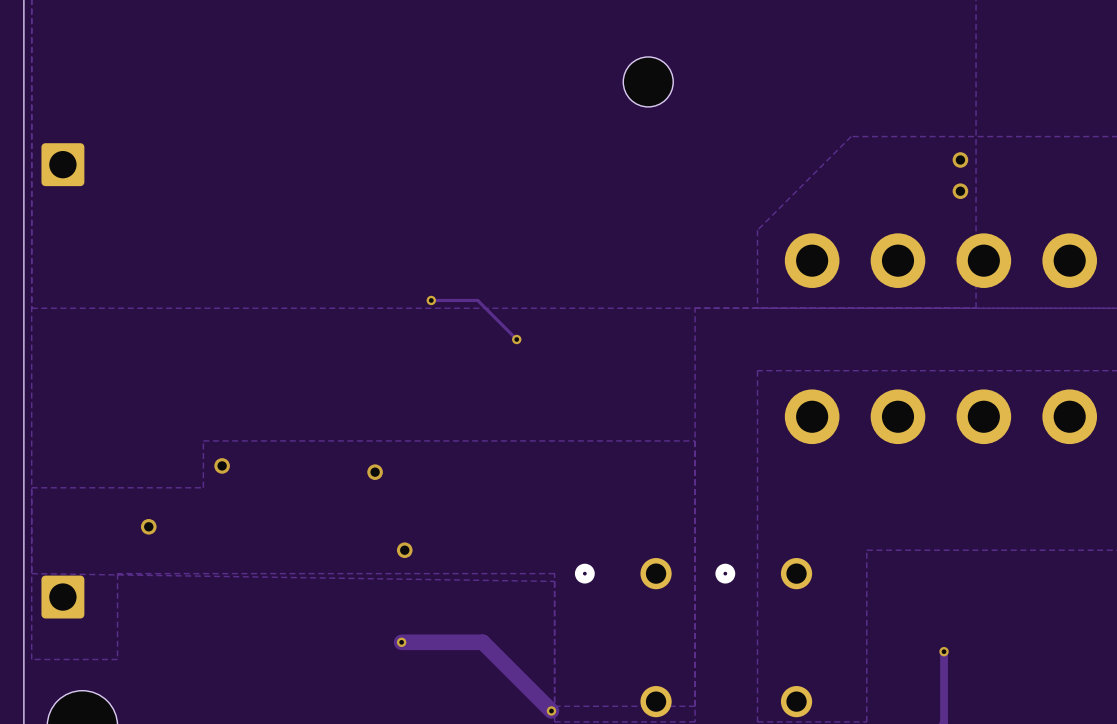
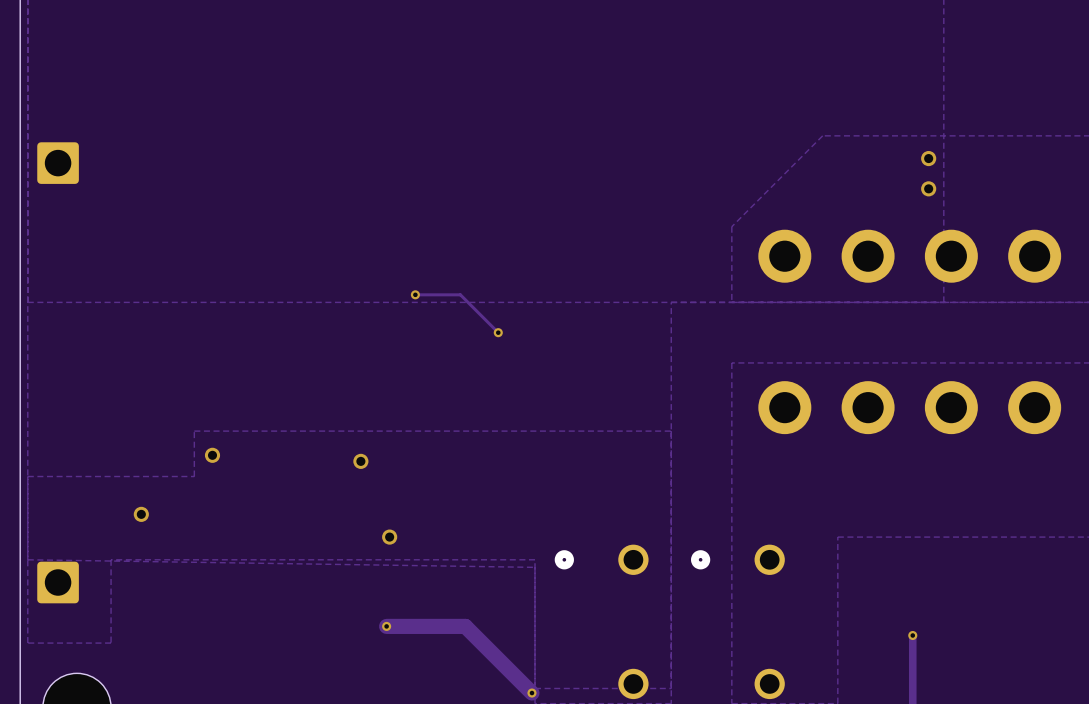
part: (648, 81) -> none

